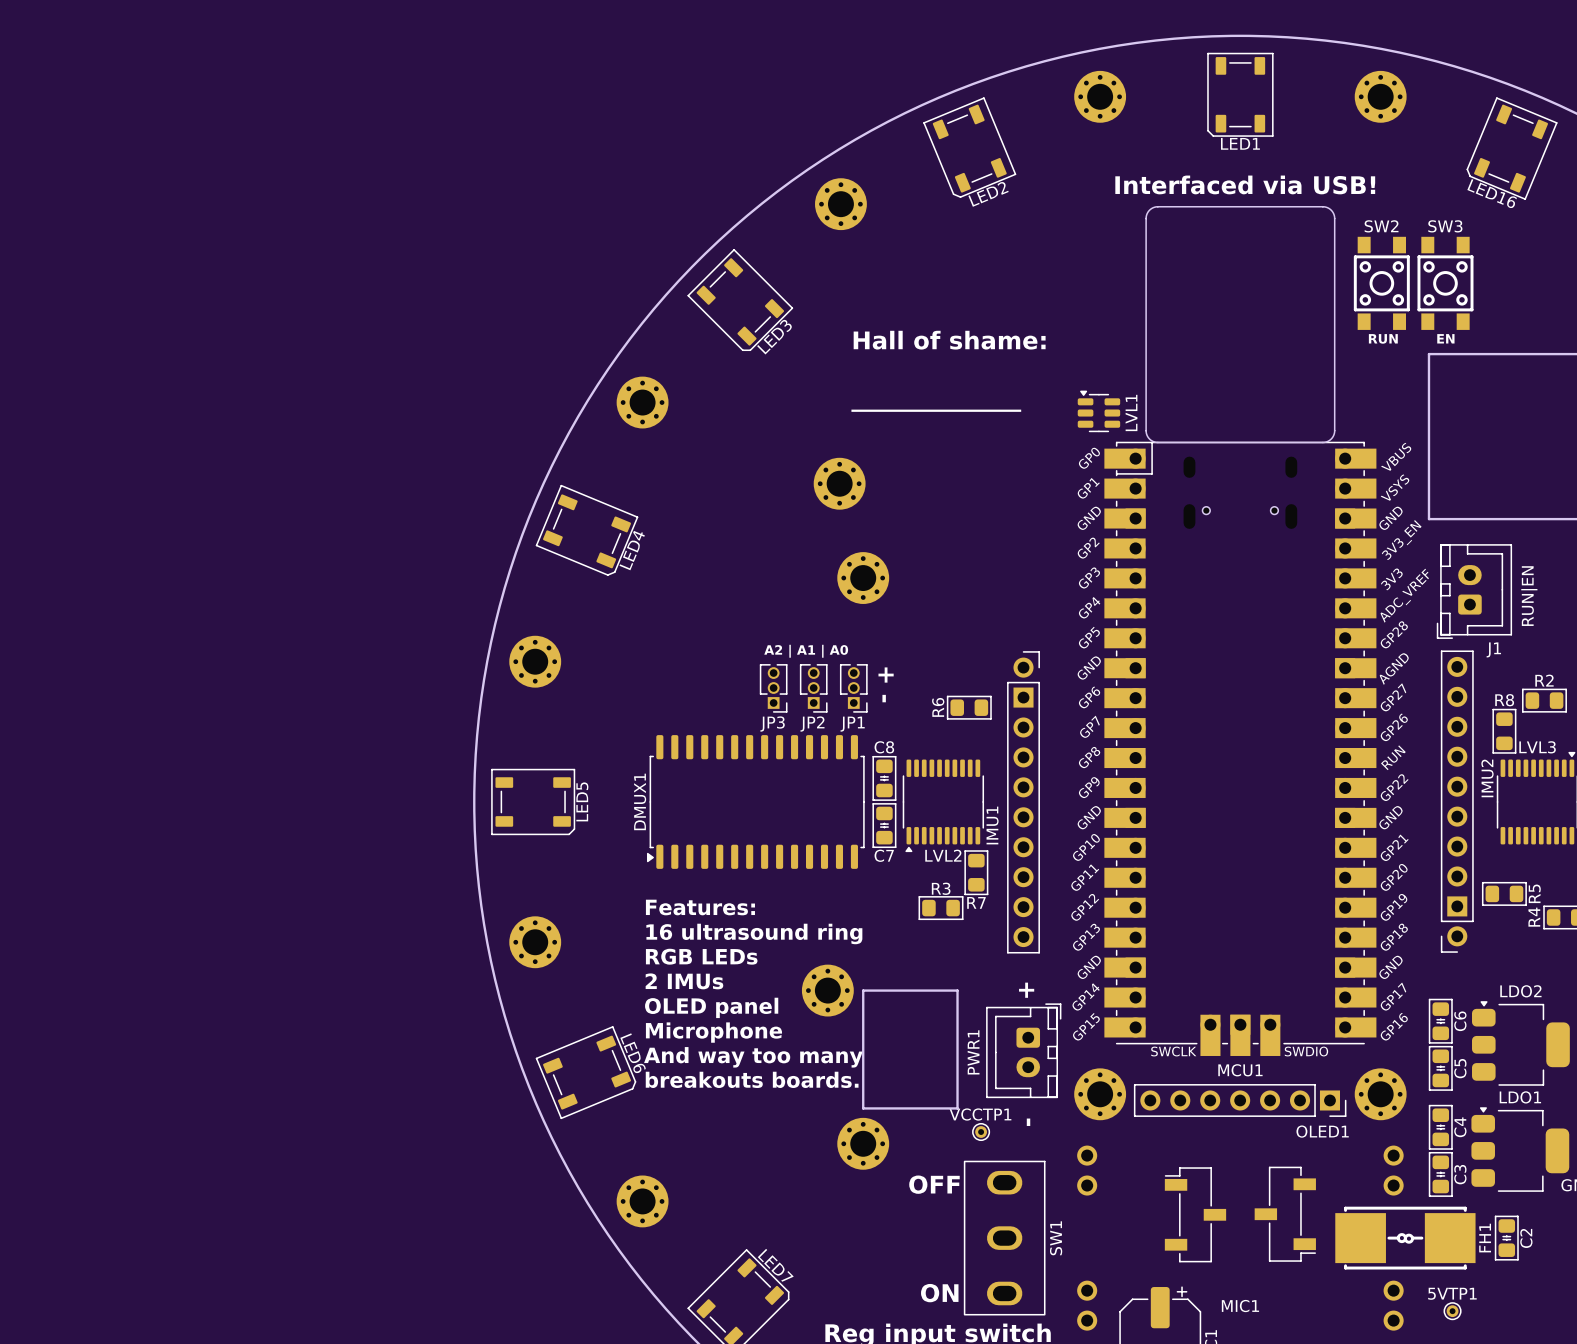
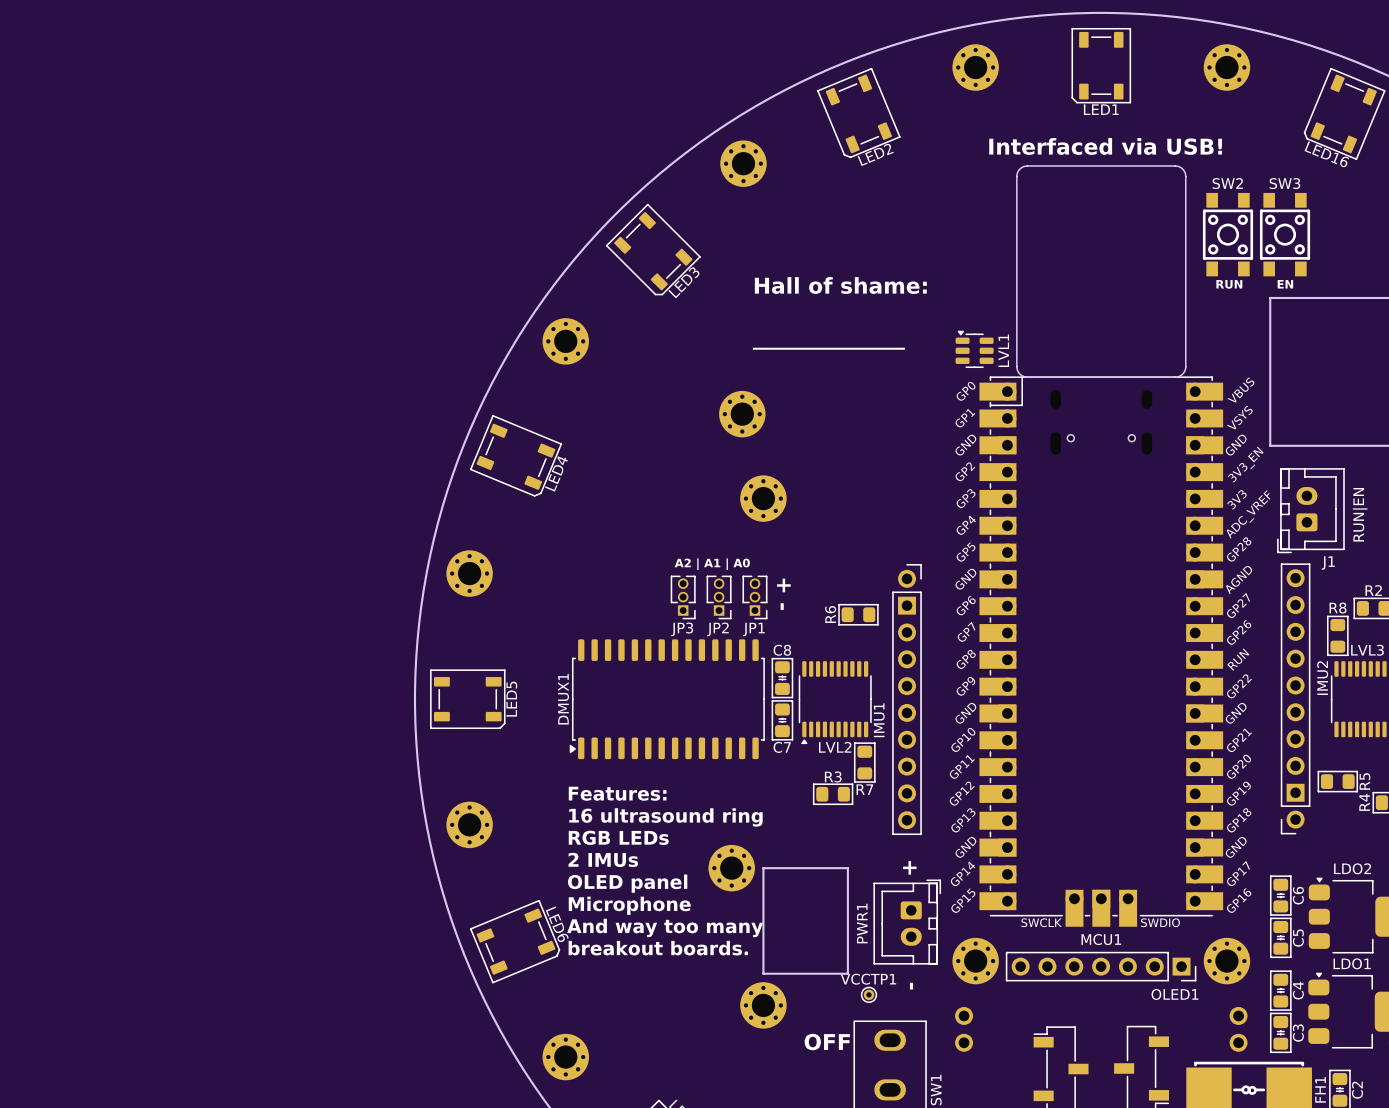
text: breakouts boards. (752, 1079) -> breakout boards. (658, 948)

